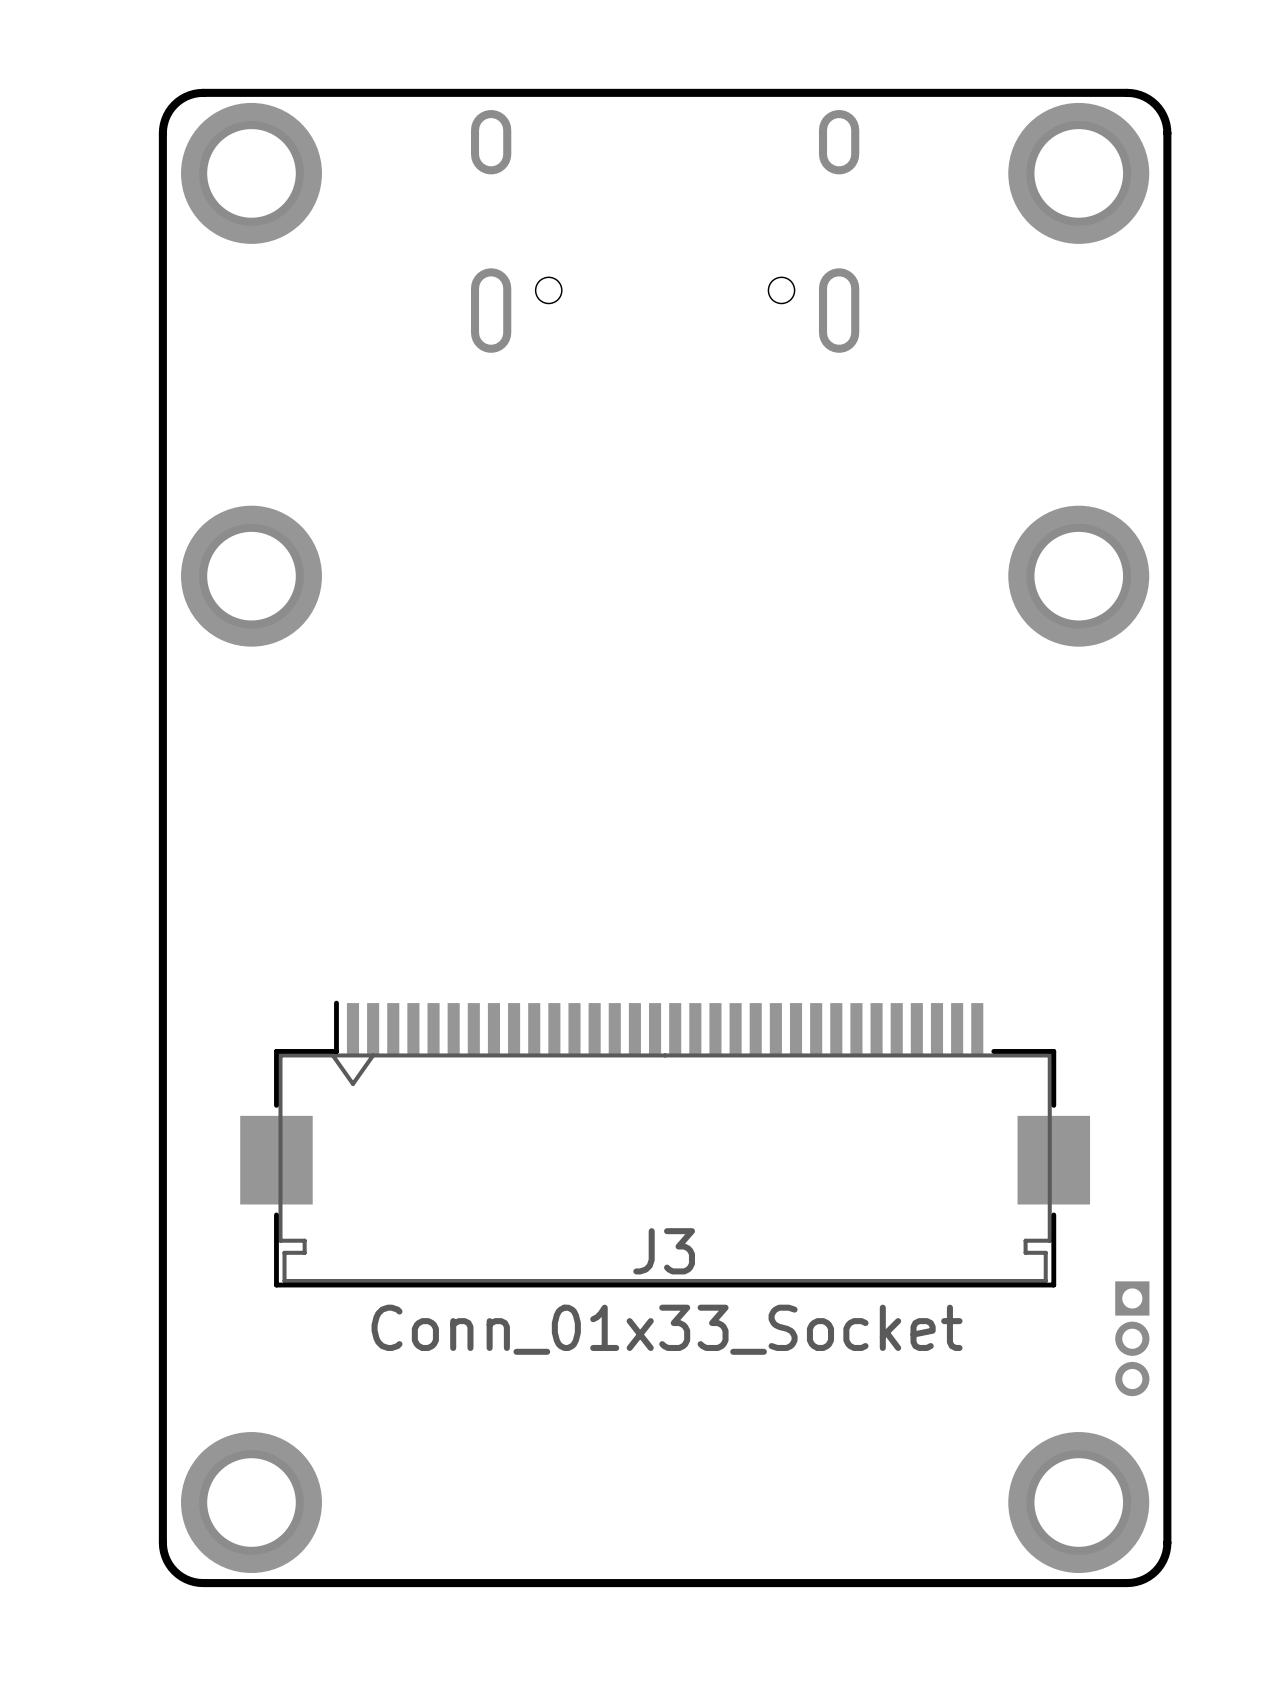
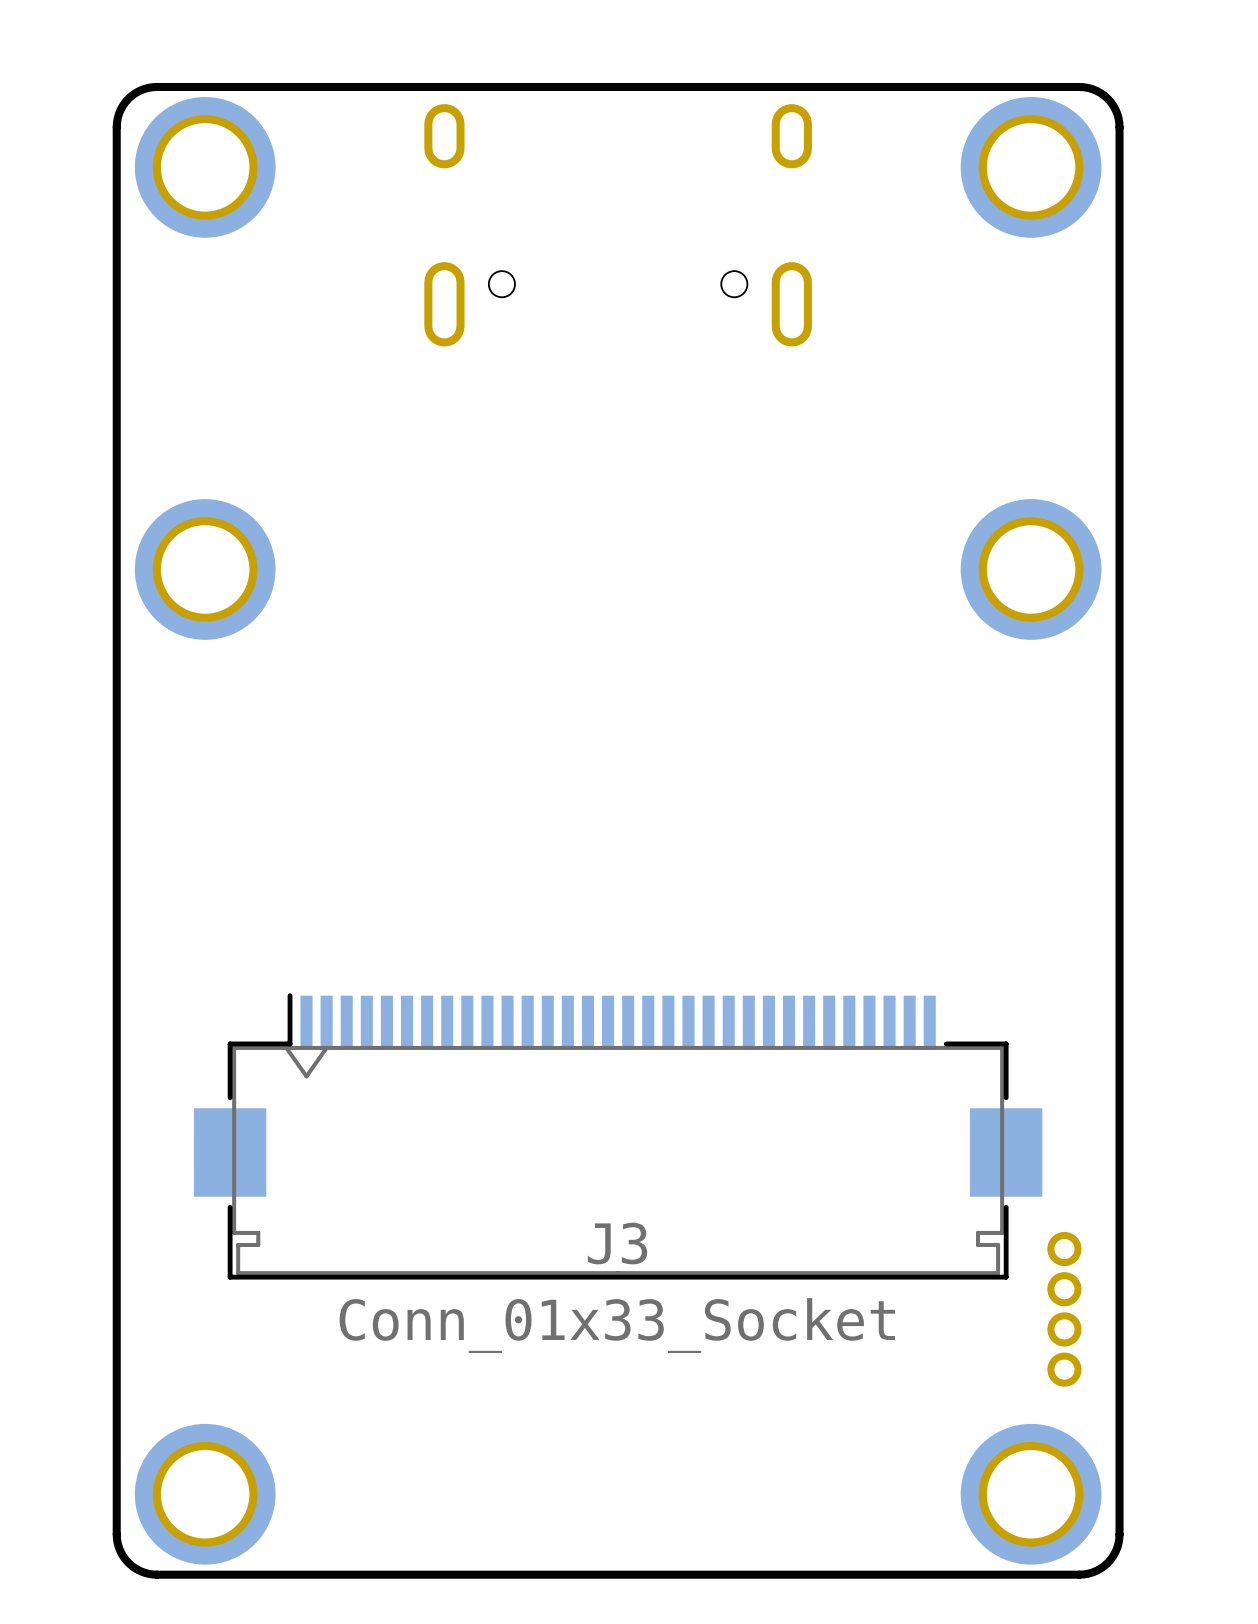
part footprint: [1115, 1281, 1150, 1397] -> [1047, 1231, 1082, 1387]

